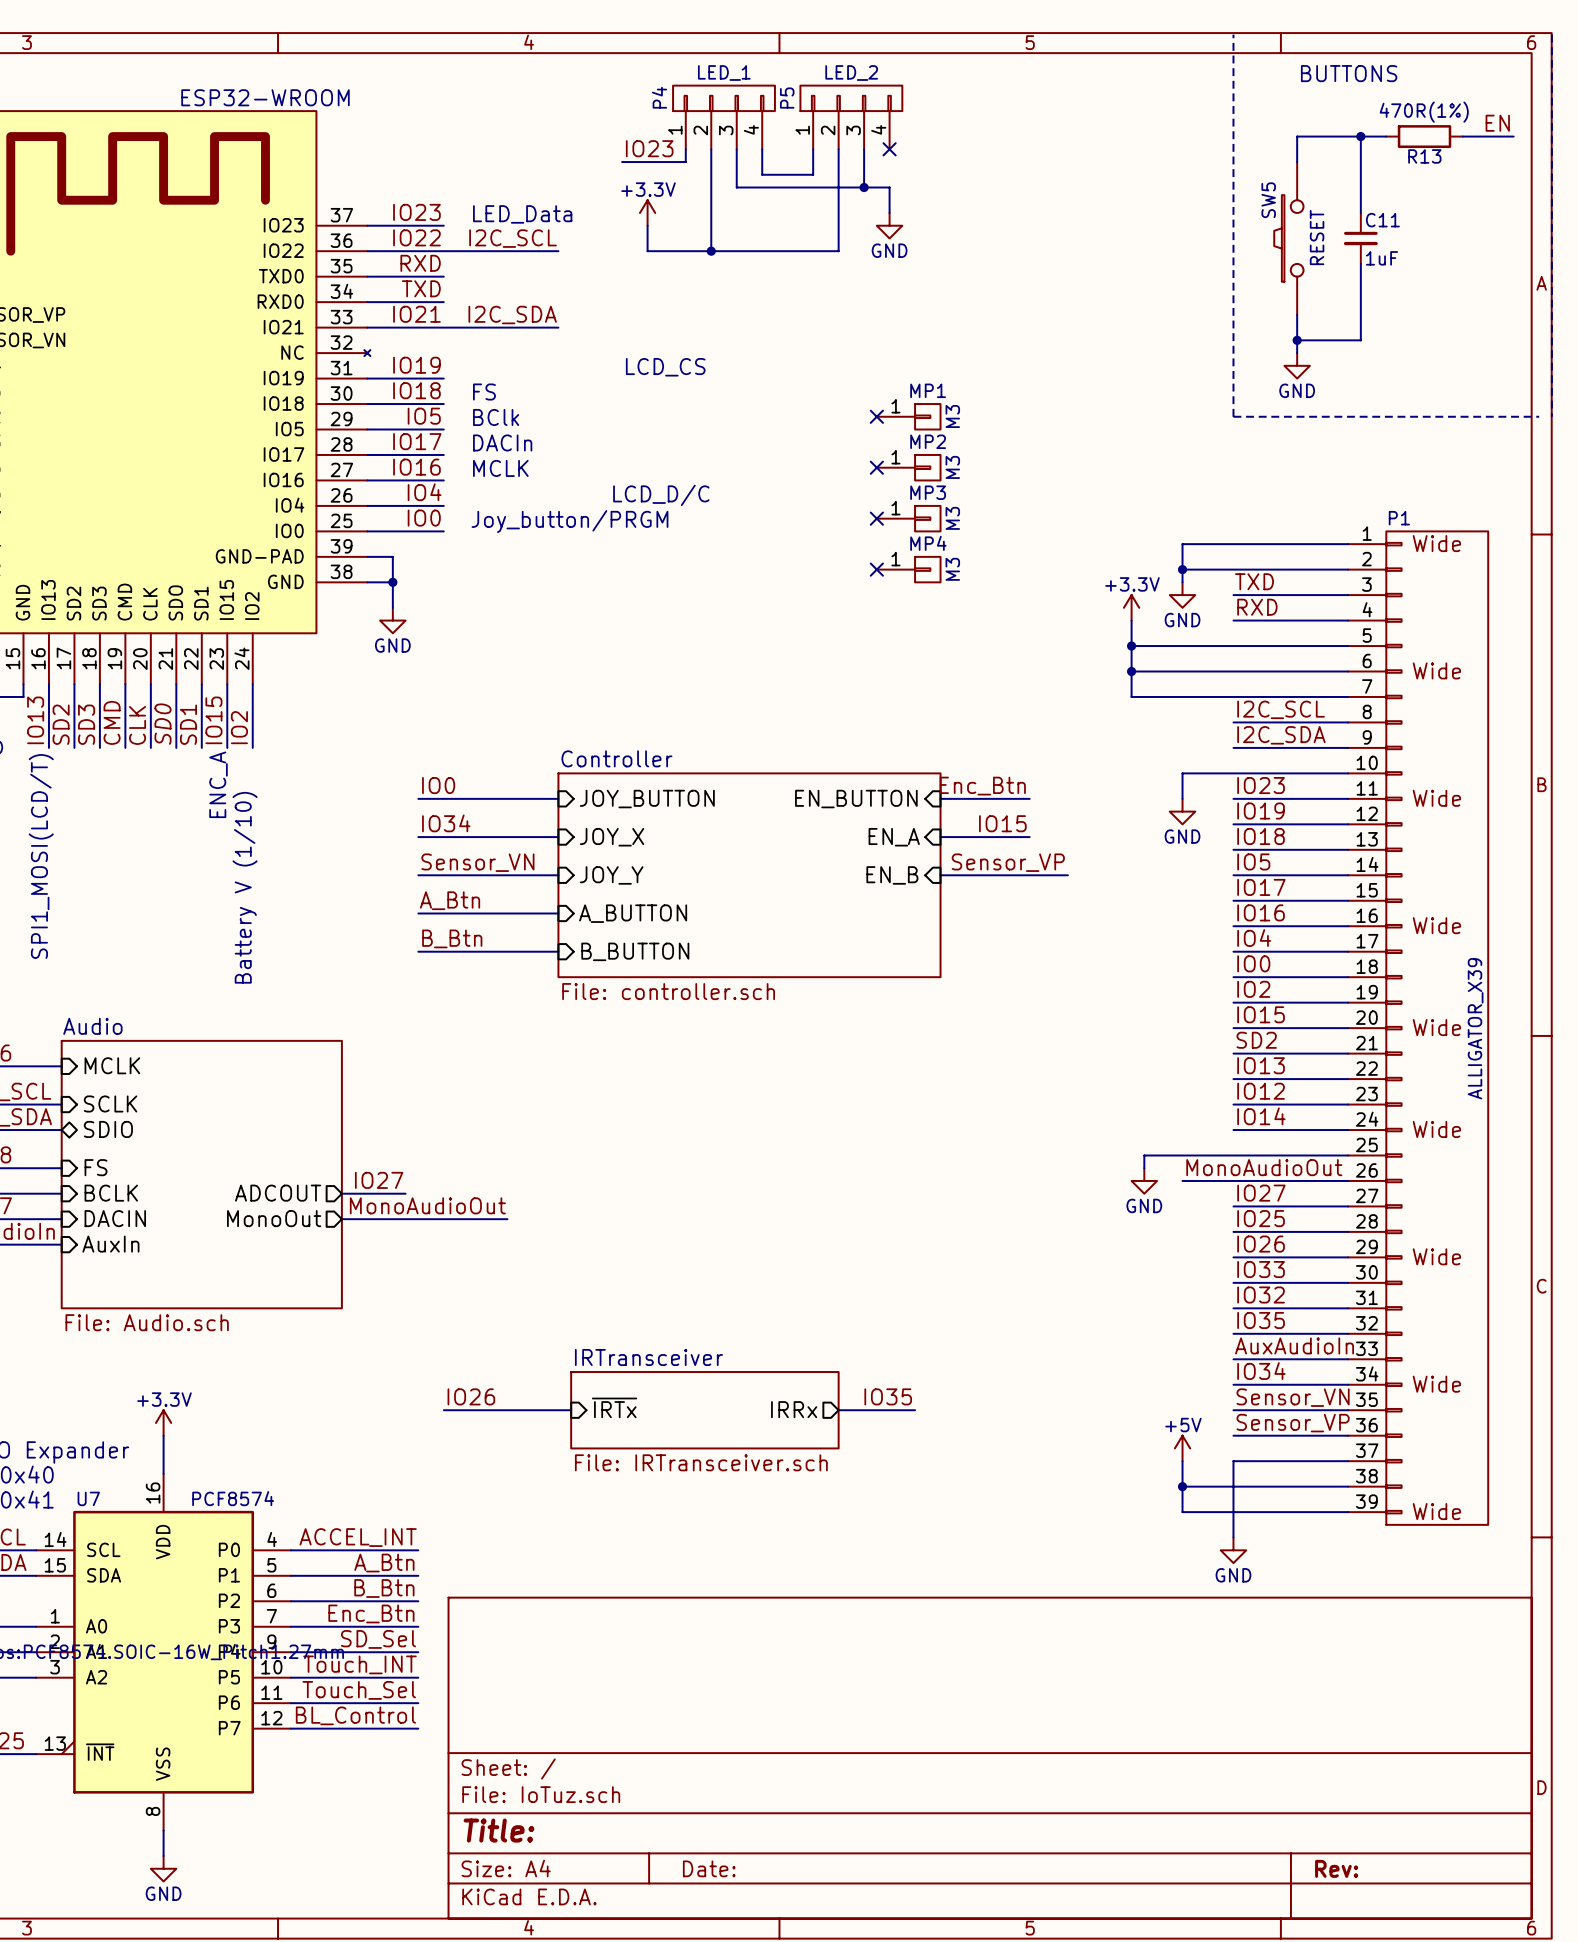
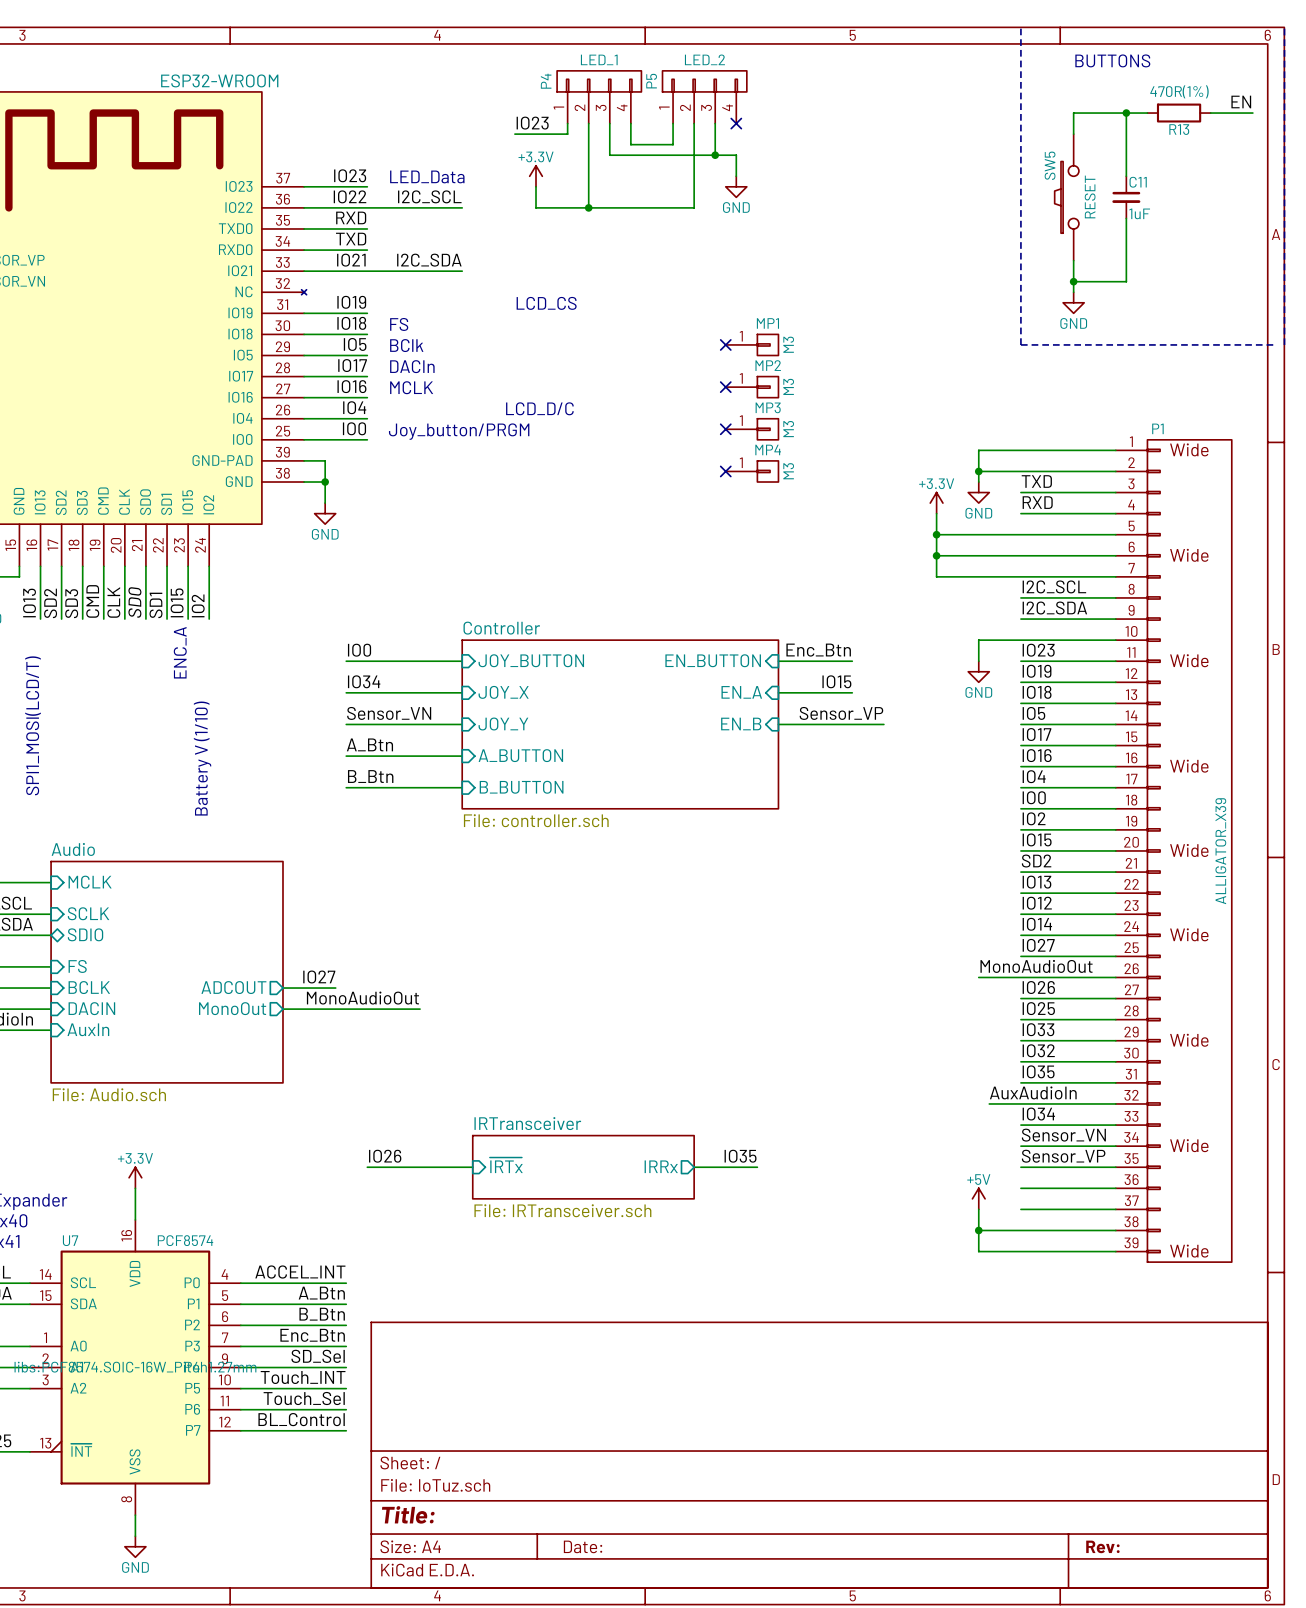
label: none -> IO27 (1038, 945)
wire: (1233, 1155) (1144, 1155) (1144, 1168) -> none
power symbol: GND (1144, 1180) -> none
label: IO27 (1261, 1193) -> IO26 (1038, 987)
label: IO26 (1261, 1244) -> IO33 (1038, 1029)
label: IO33 (1261, 1269) -> IO32 (1038, 1050)
label: IO32 (1261, 1295) -> IO35 (1038, 1071)
label: none -> AuxAudioIn (1033, 1092)
label: IO35 (1261, 1320) -> none
wire: none -> (989, 1103) (1020, 1103)
label: AuxAudioIn (1294, 1345) -> IO34 (1038, 1114)
label: IO34 (1261, 1371) -> Sensor_VN (1063, 1135)
label: Sensor_VN (1293, 1397) -> Sensor_VP (1063, 1156)
label: Sensor_VP (1293, 1423) -> none
wire: (1233, 1461) (1233, 1537) -> none
power symbol: GND (1233, 1550) -> none

